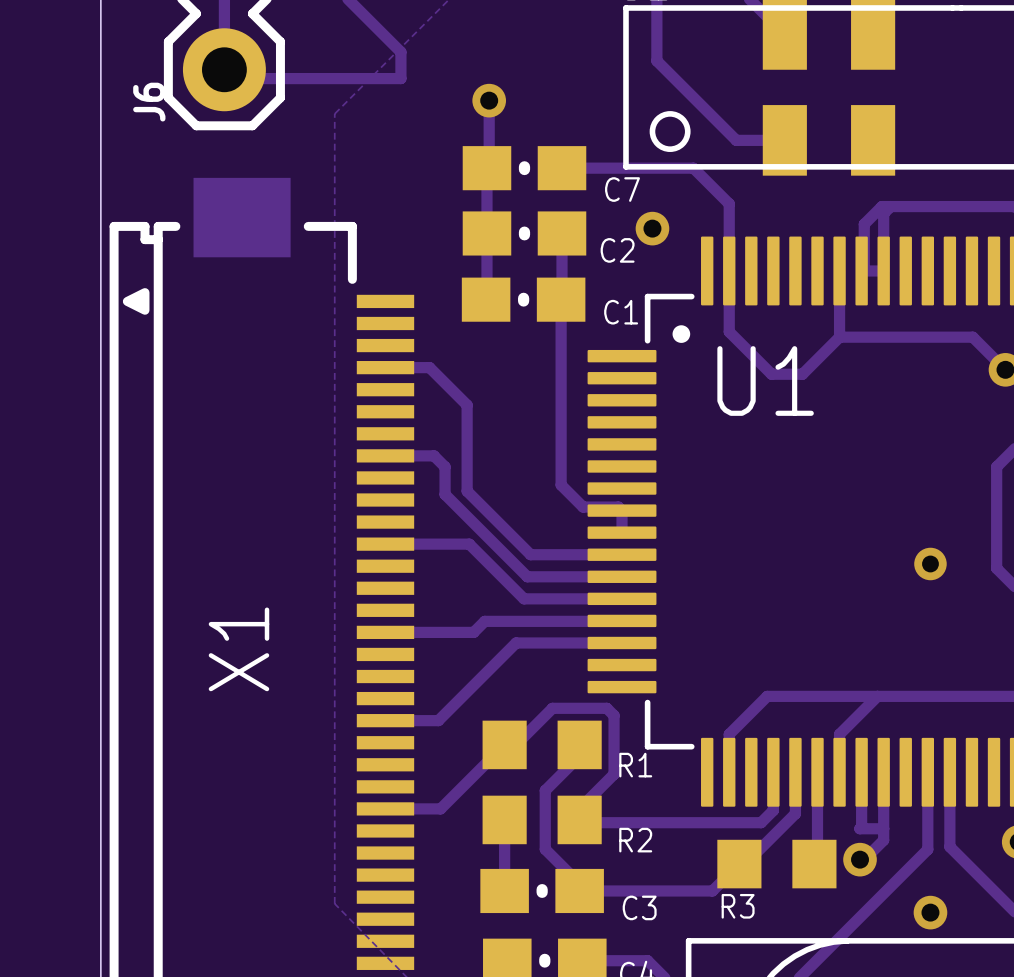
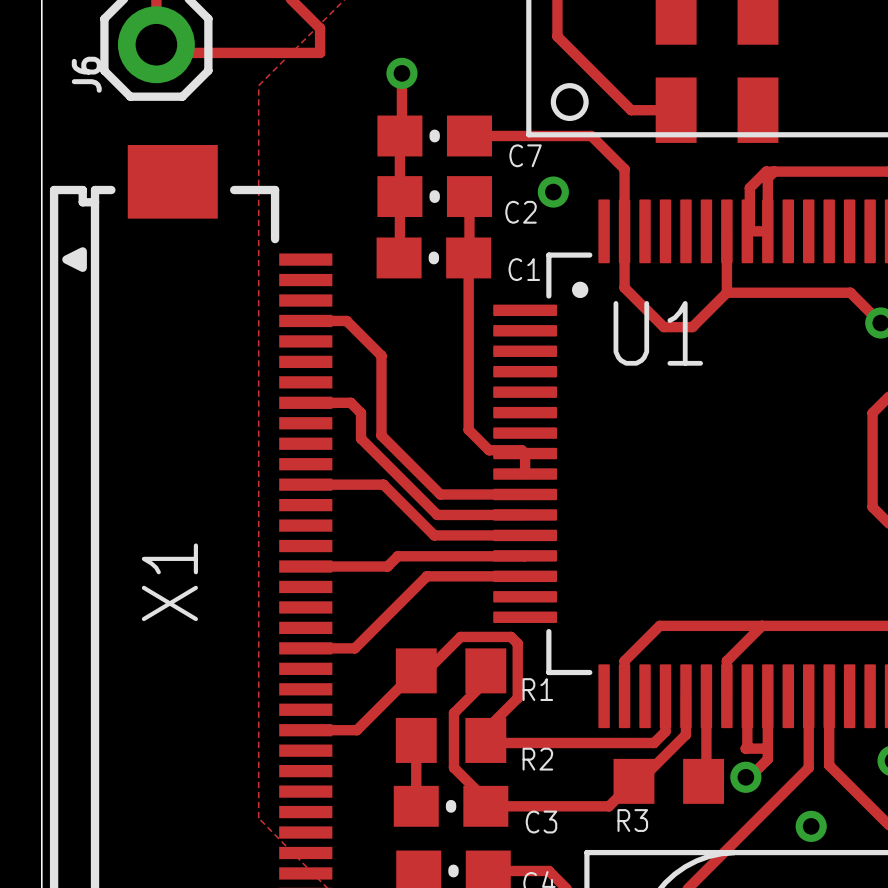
via: (930, 563) -> none

